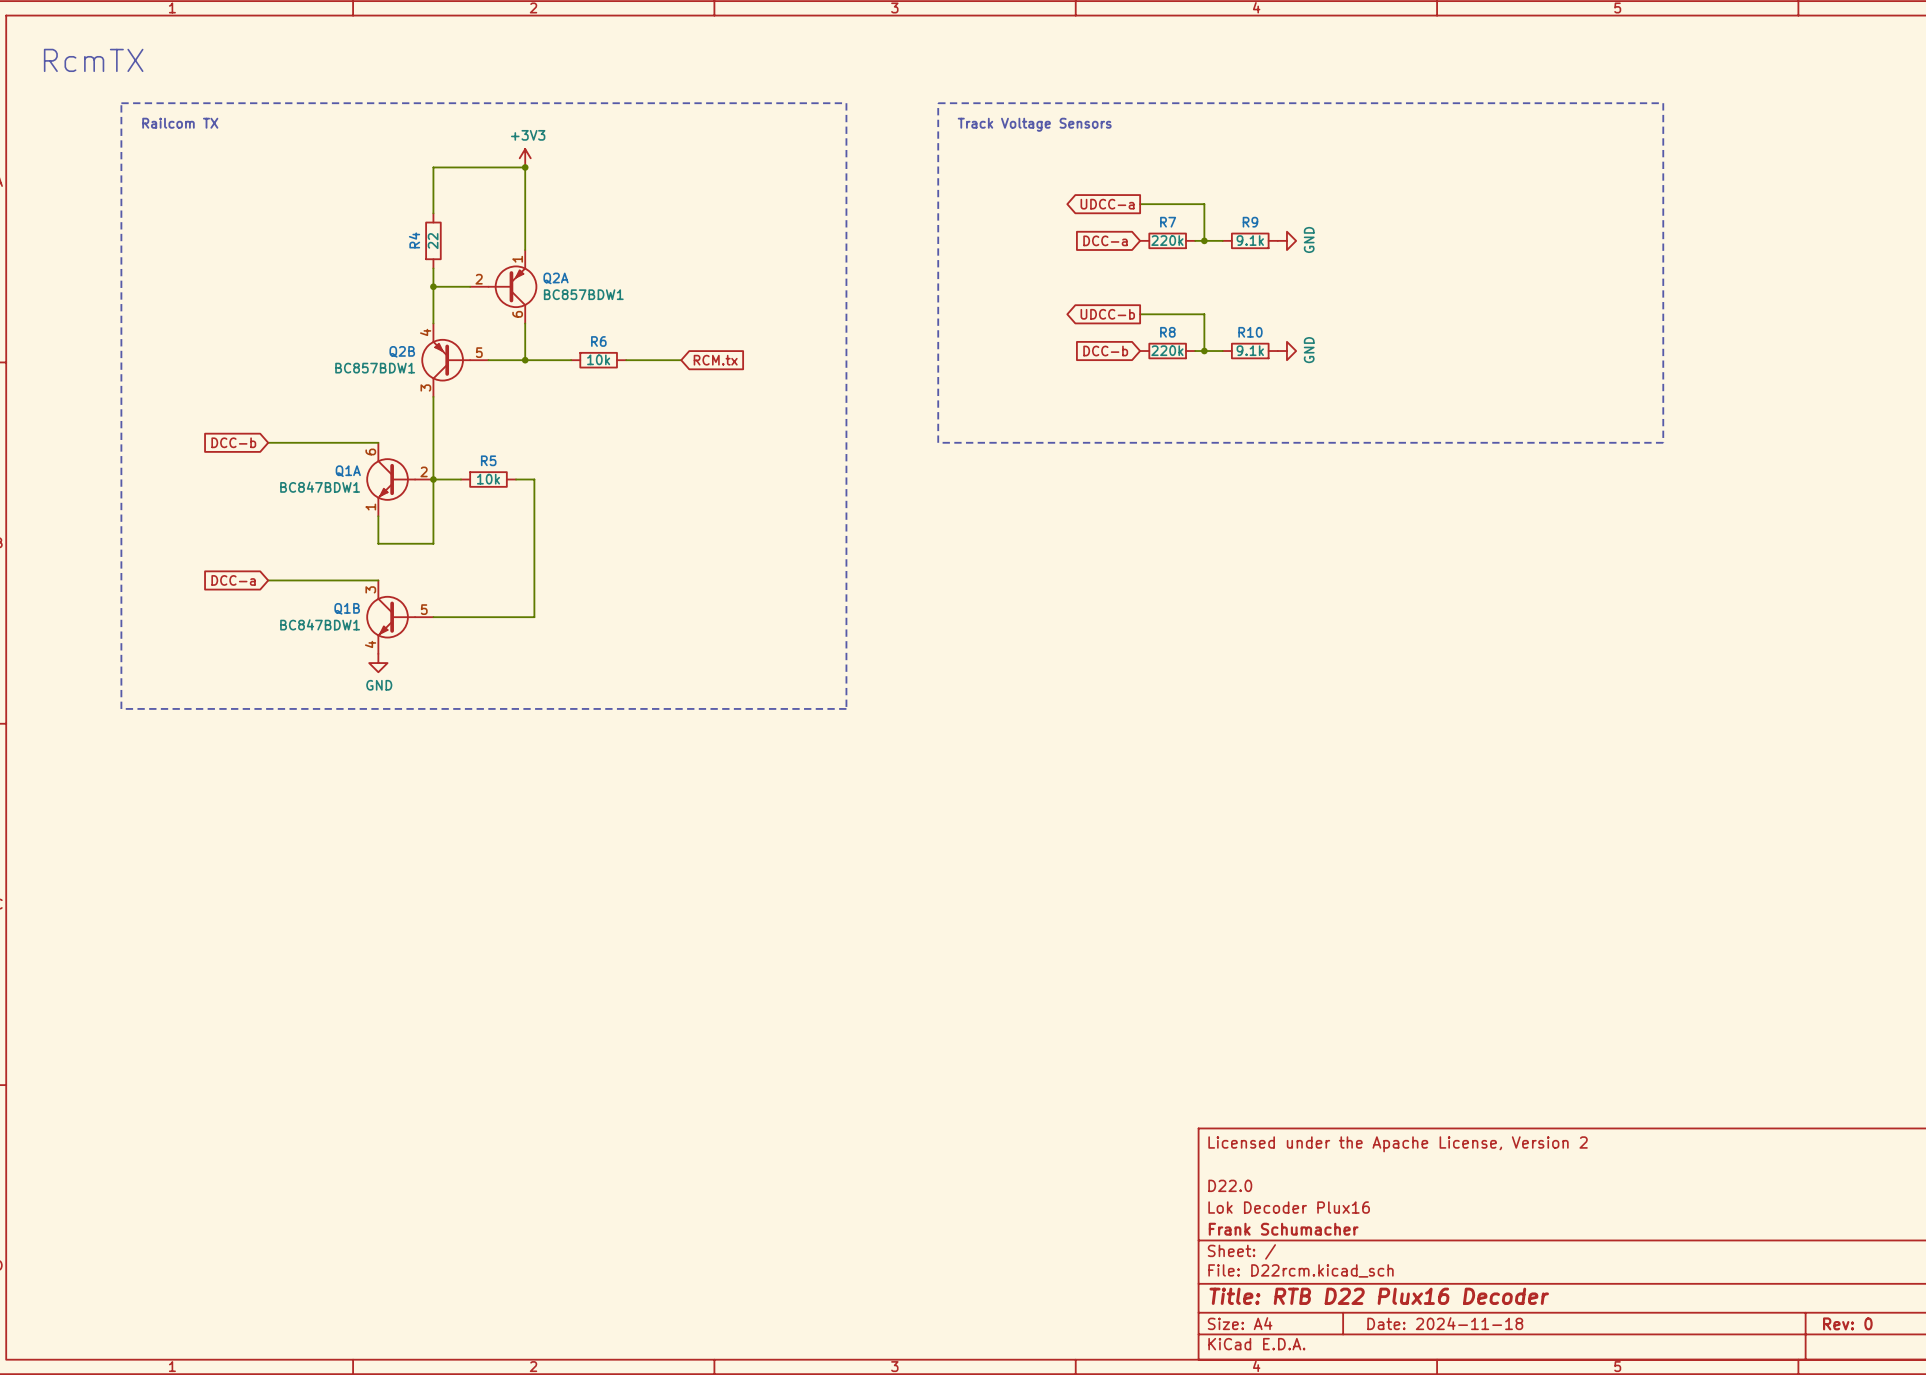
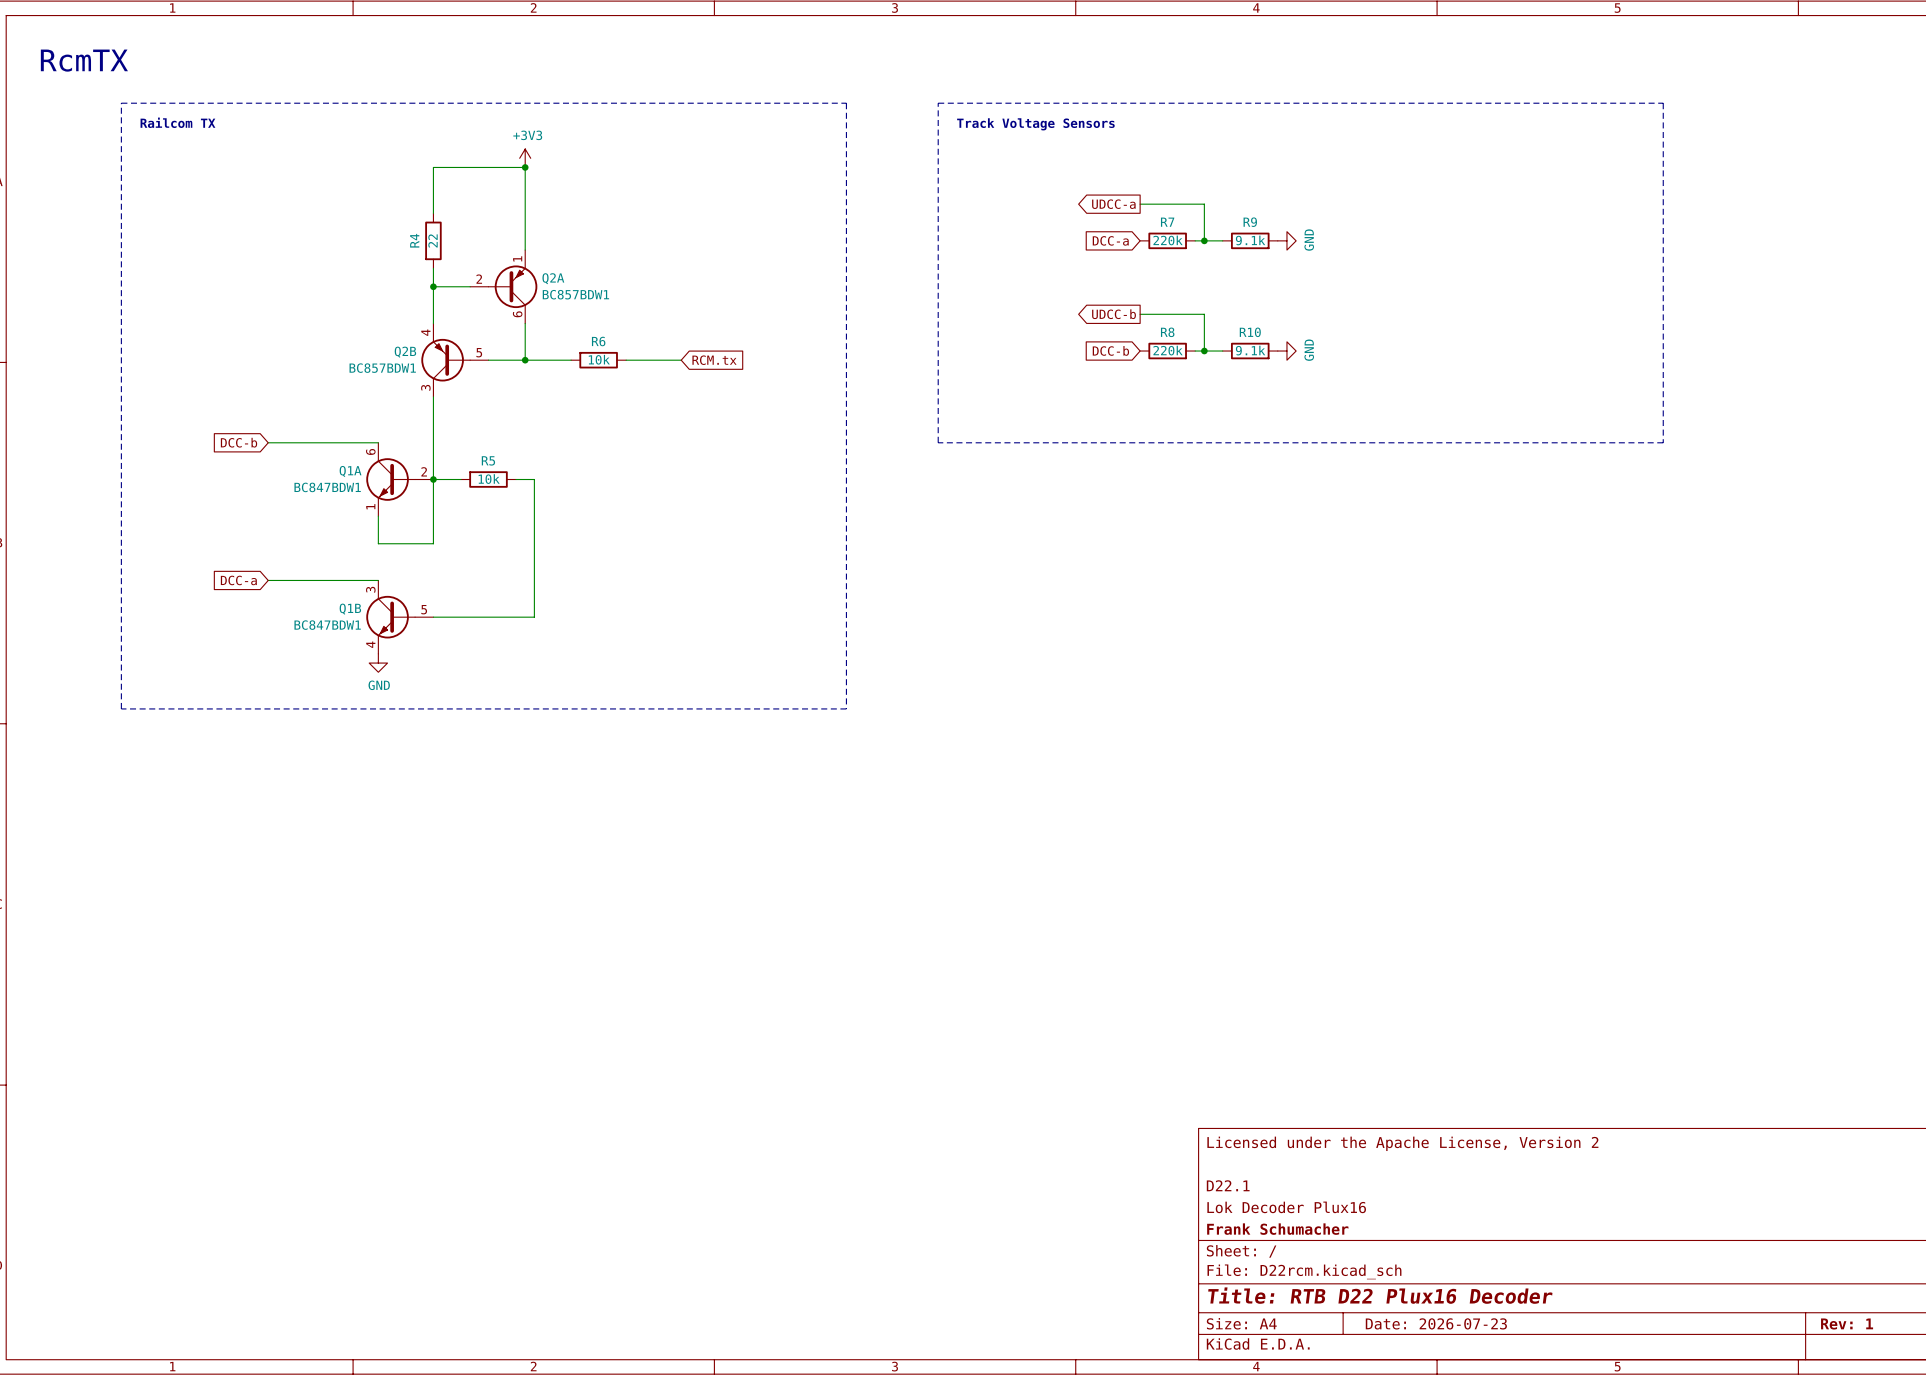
title block: D22.0 (1230, 1185) -> D22.1 (1228, 1185)
title block: Date: 2024-11-18 (1445, 1323) -> Date: 2026-07-23 (1436, 1323)
title block: Rev: 0 (1847, 1323) -> Rev: 1 (1847, 1324)

